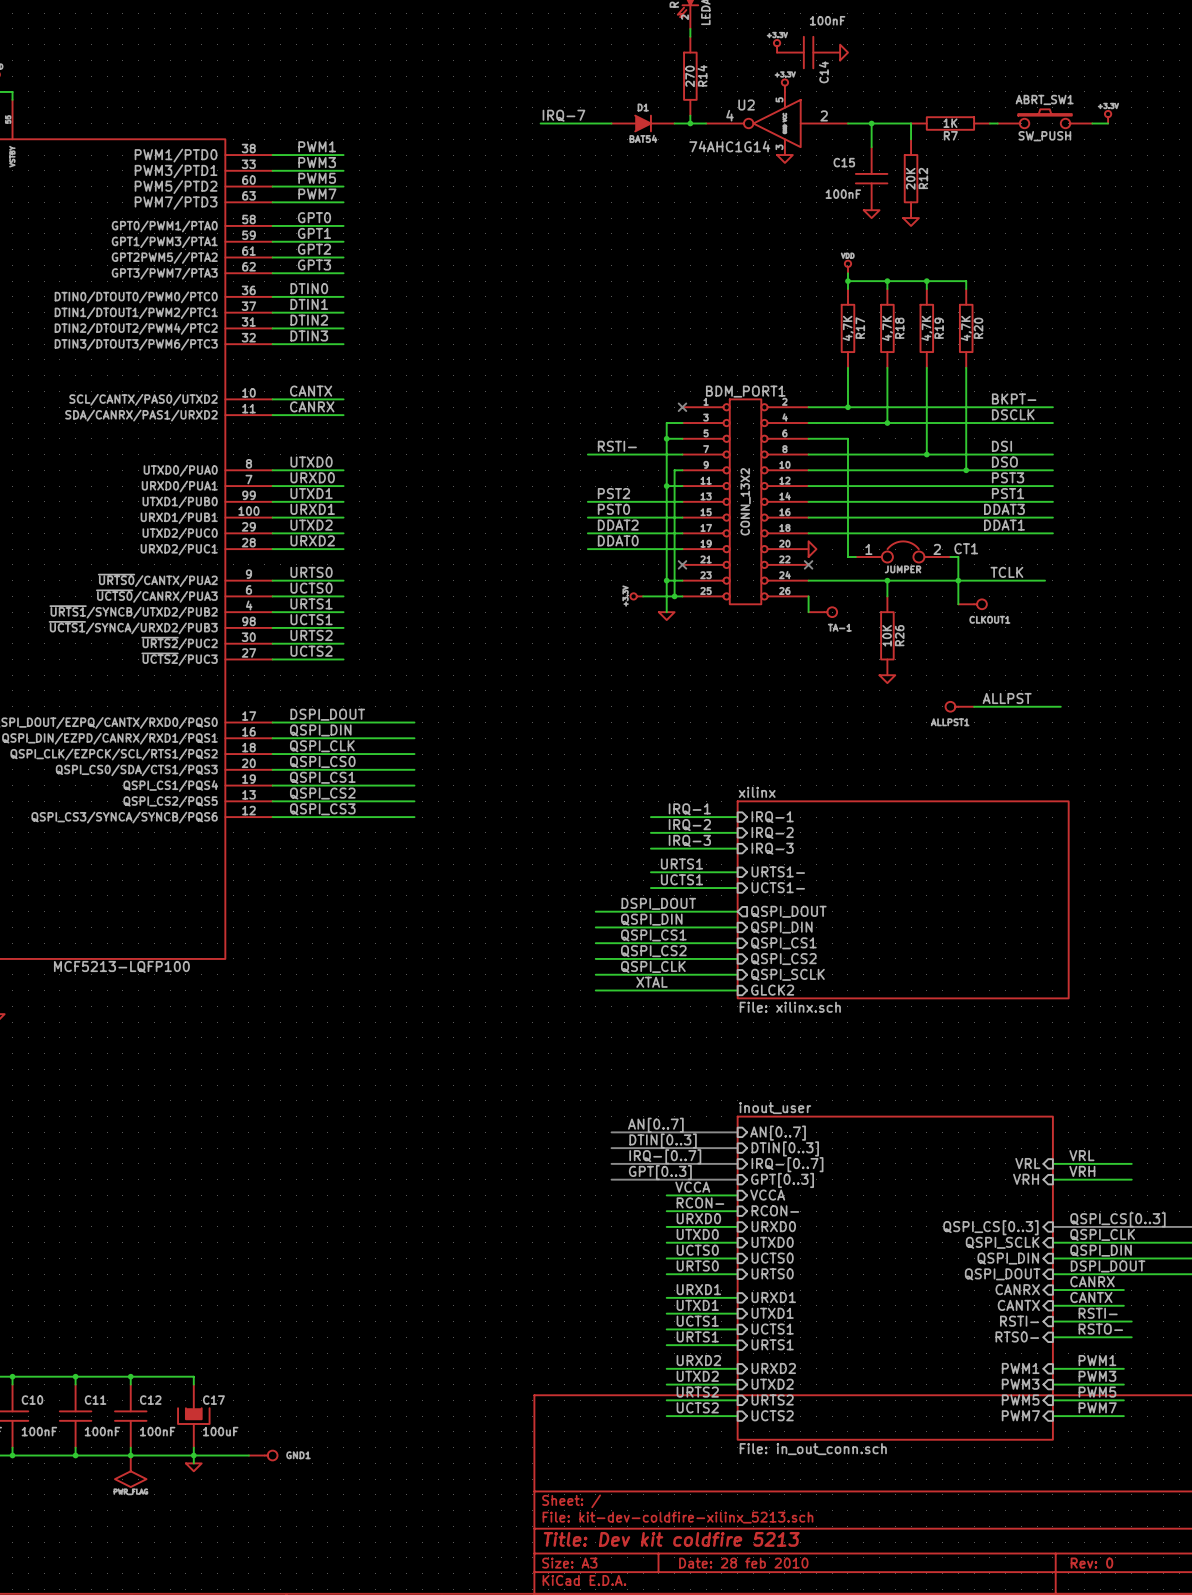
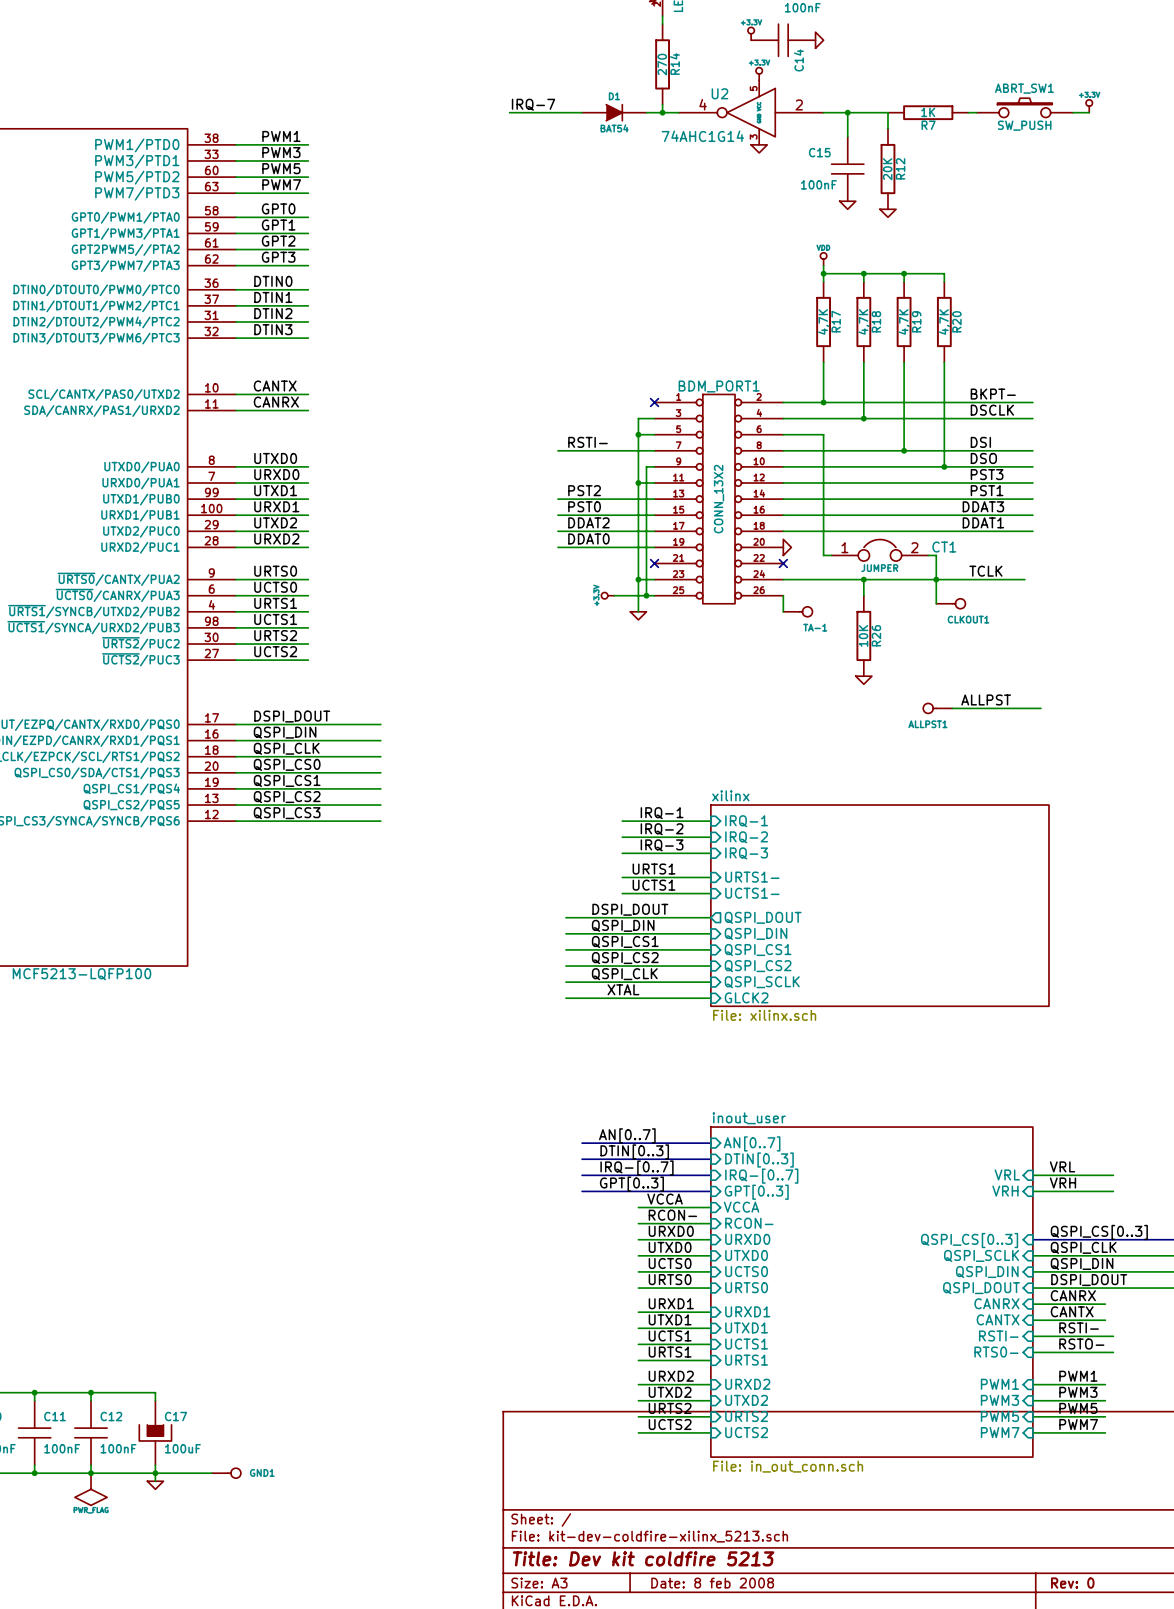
title block: Date: 28 feb 2010 (743, 1563) -> Date: 8 feb 2008 (712, 1583)

